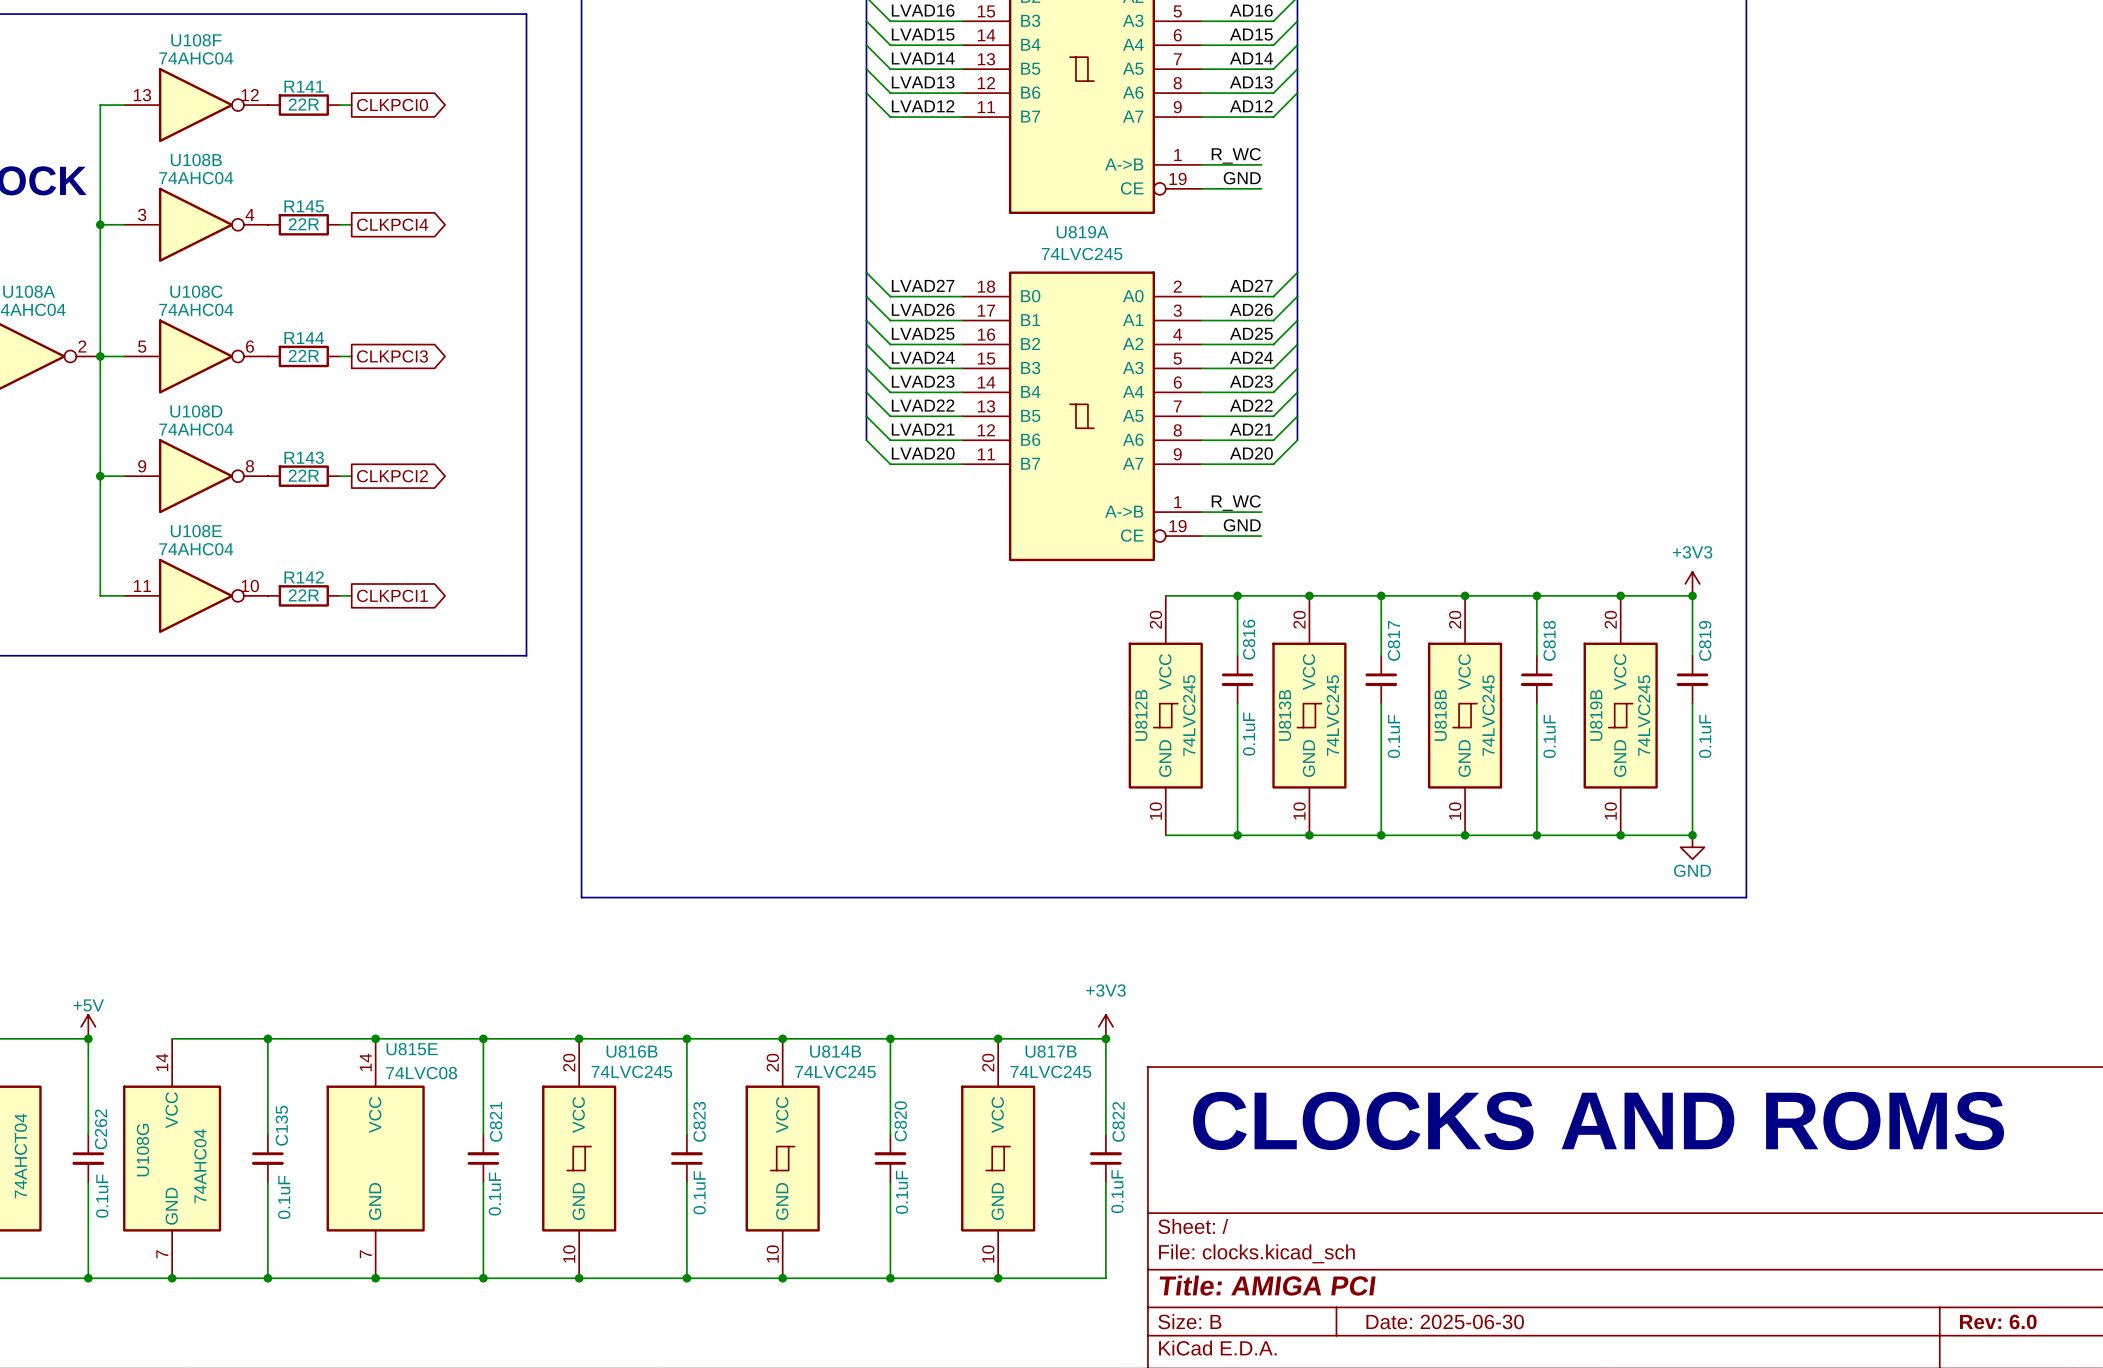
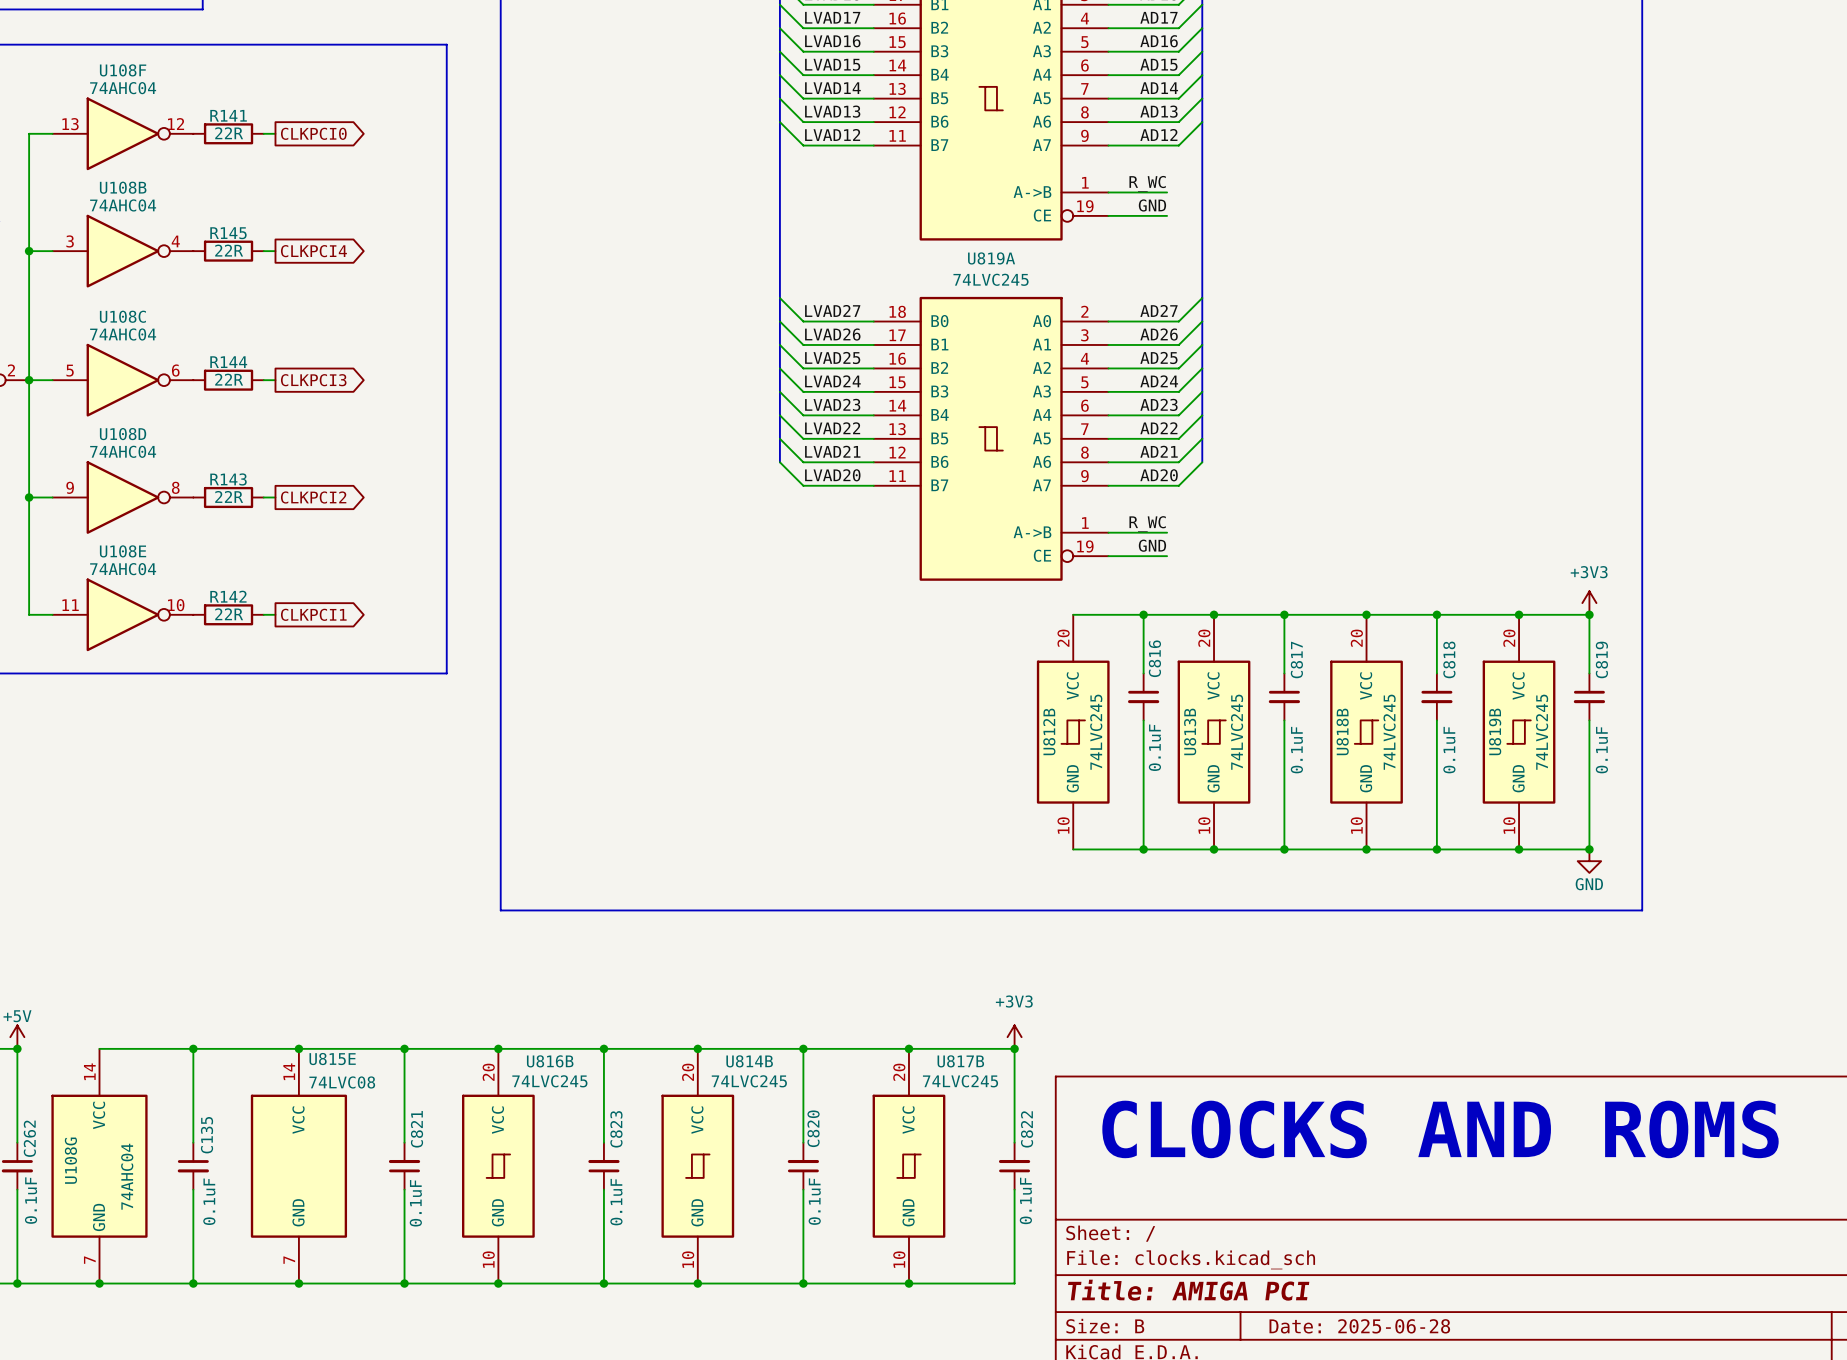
title block: Date: 2025-06-30 (1445, 1321) -> Date: 2025-06-28 (1359, 1326)

